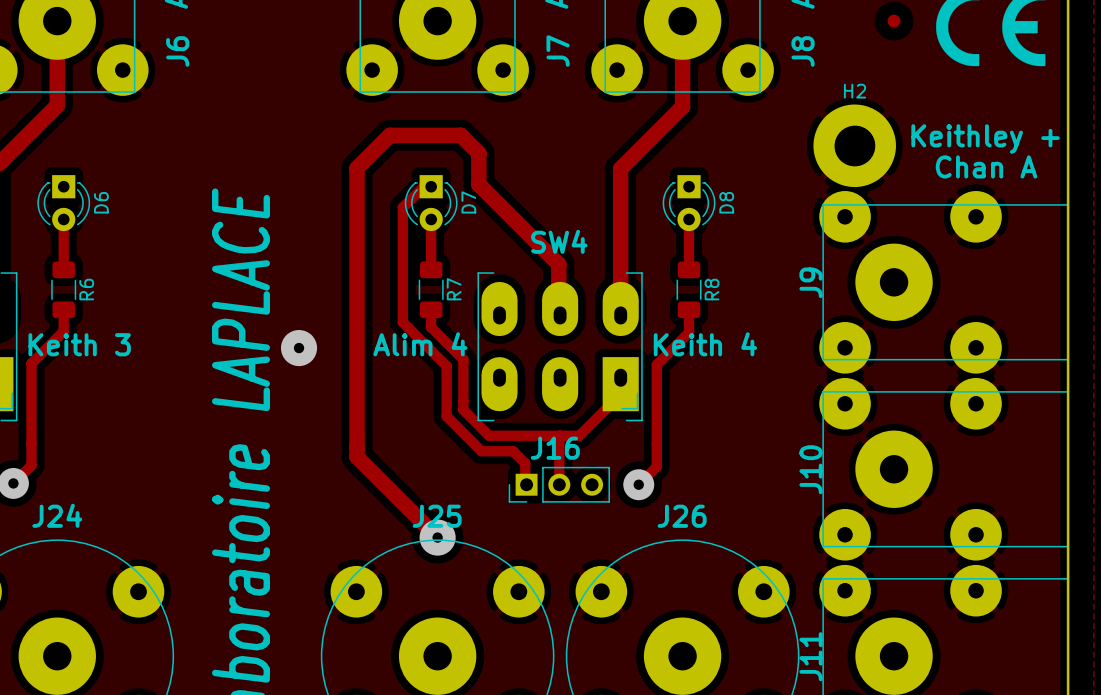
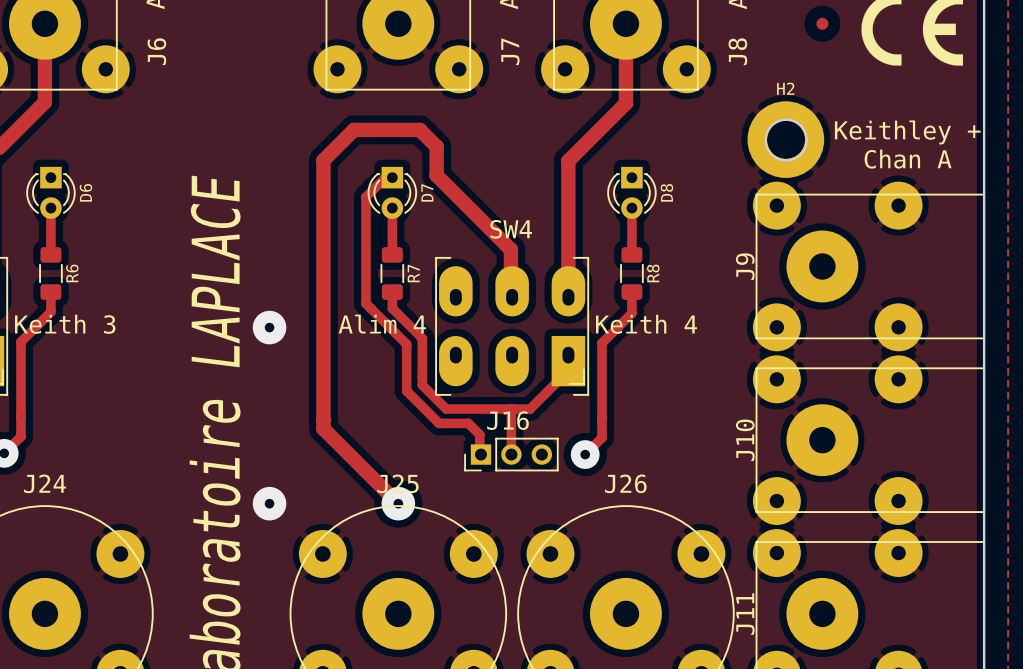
via: none -> (269, 503)

